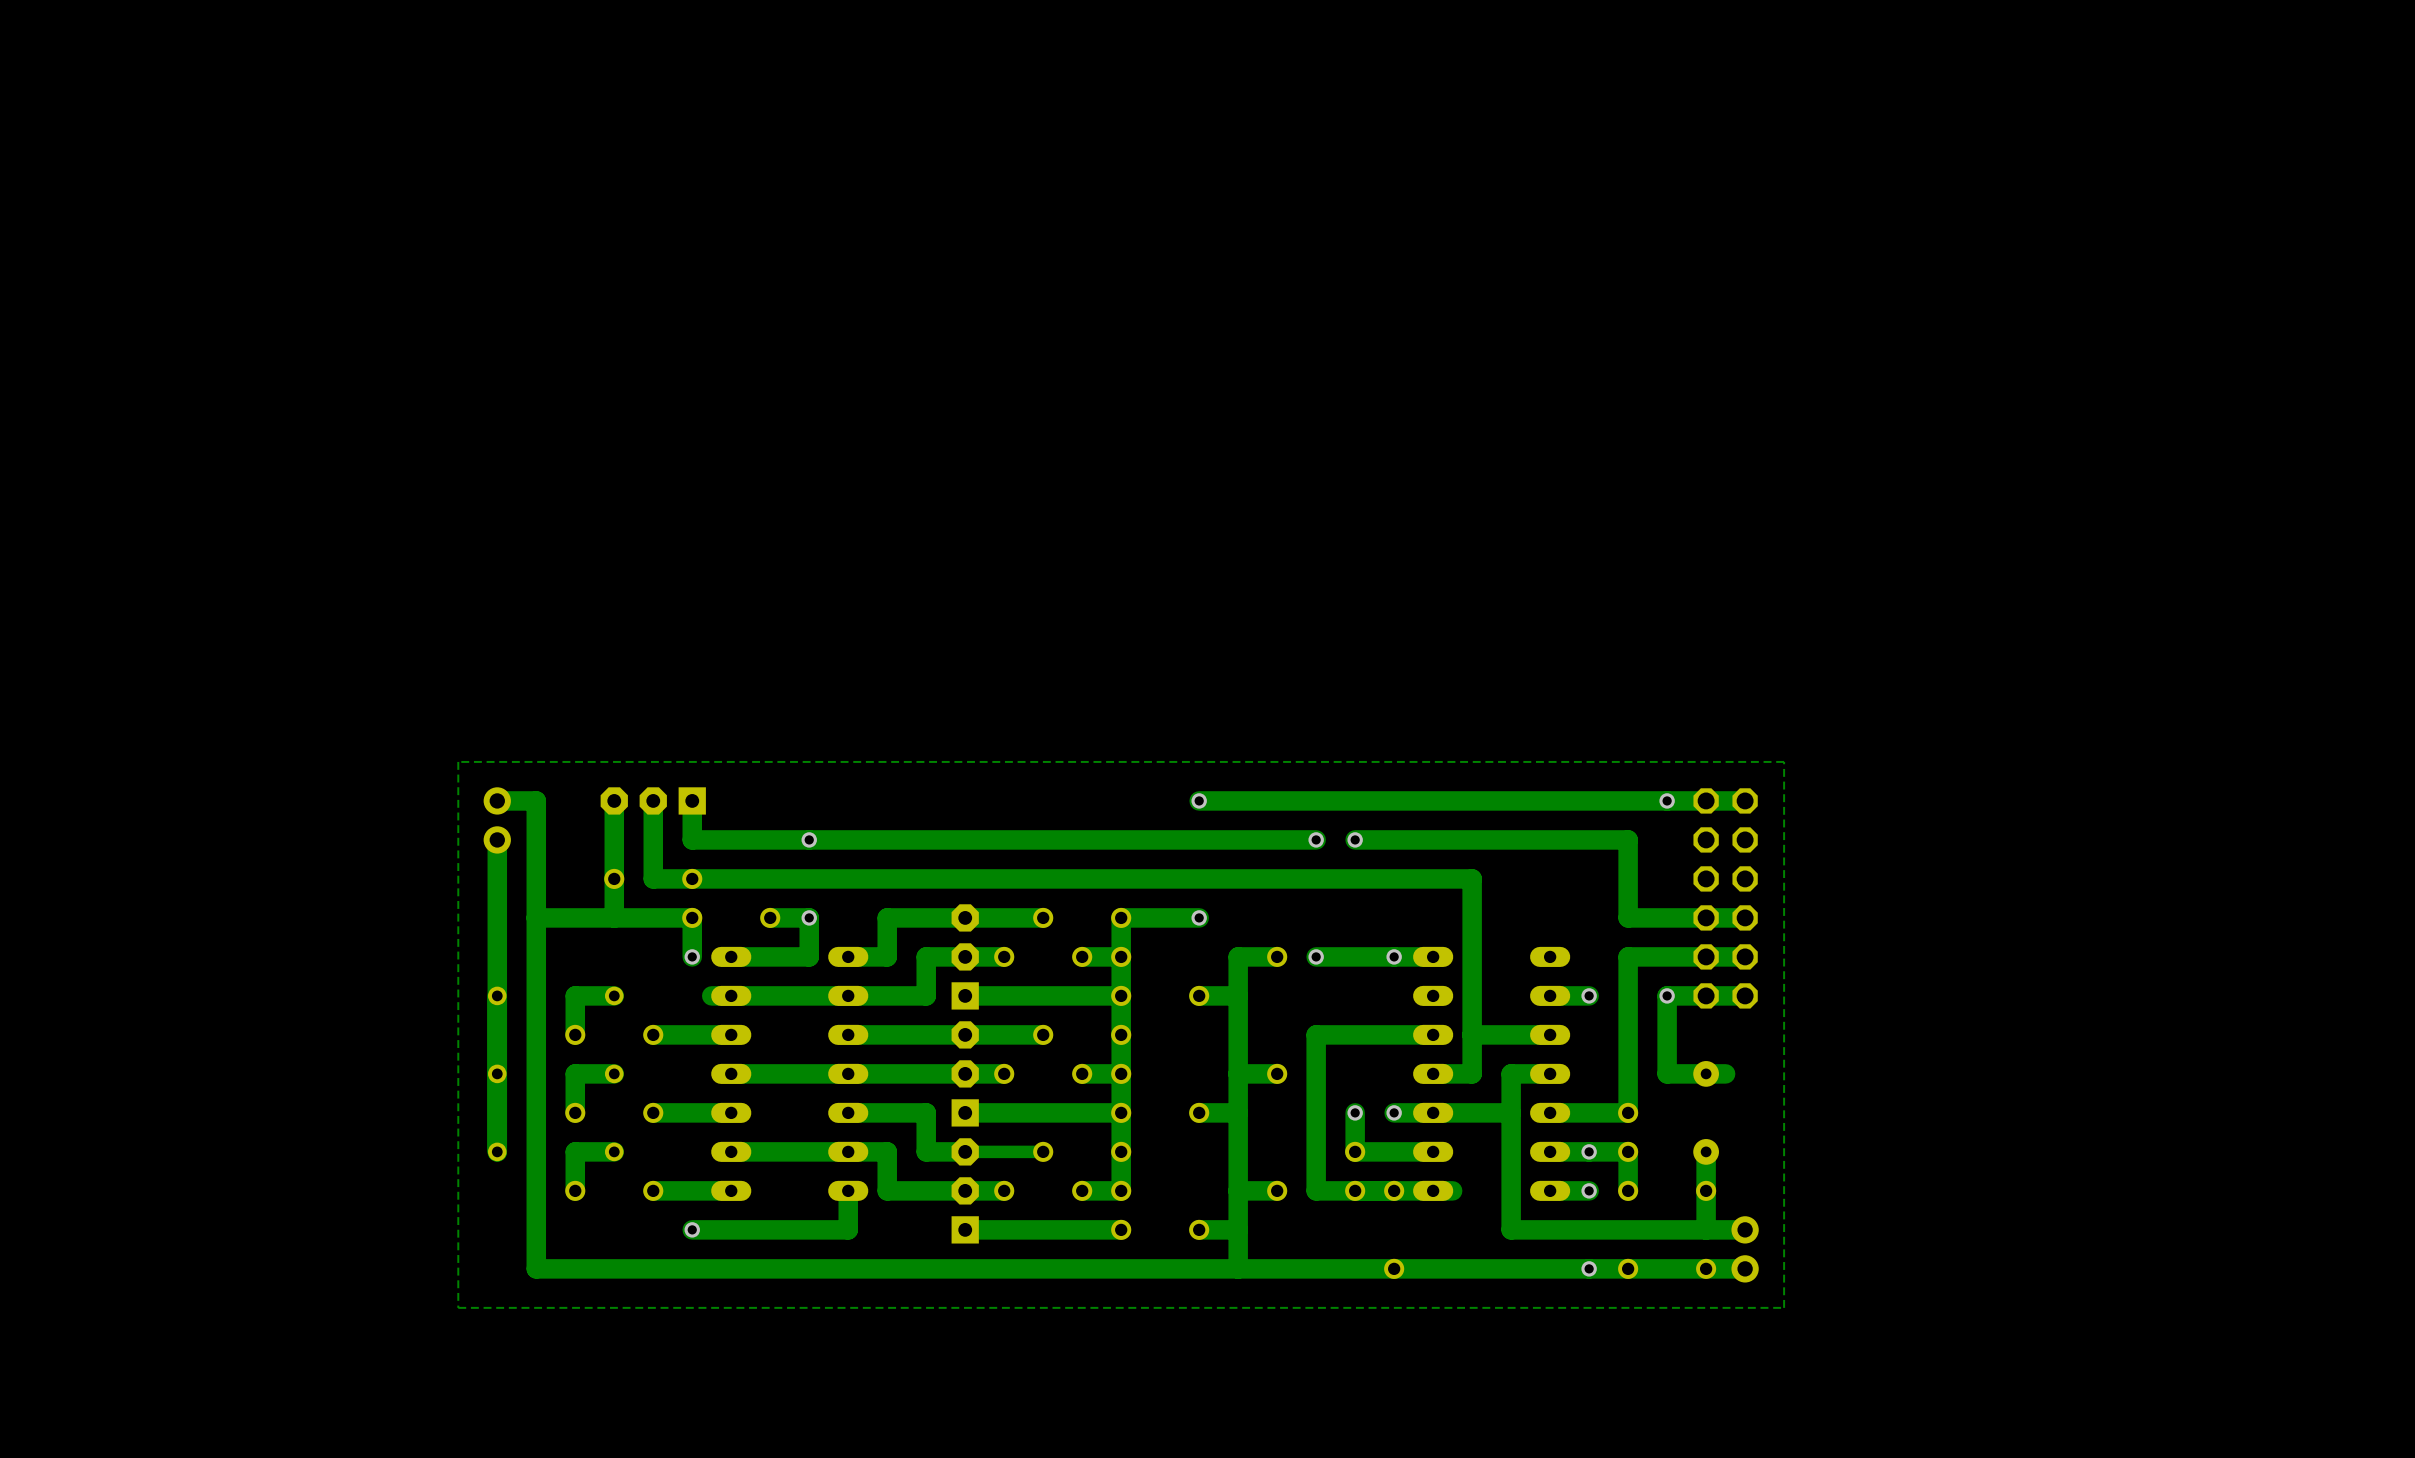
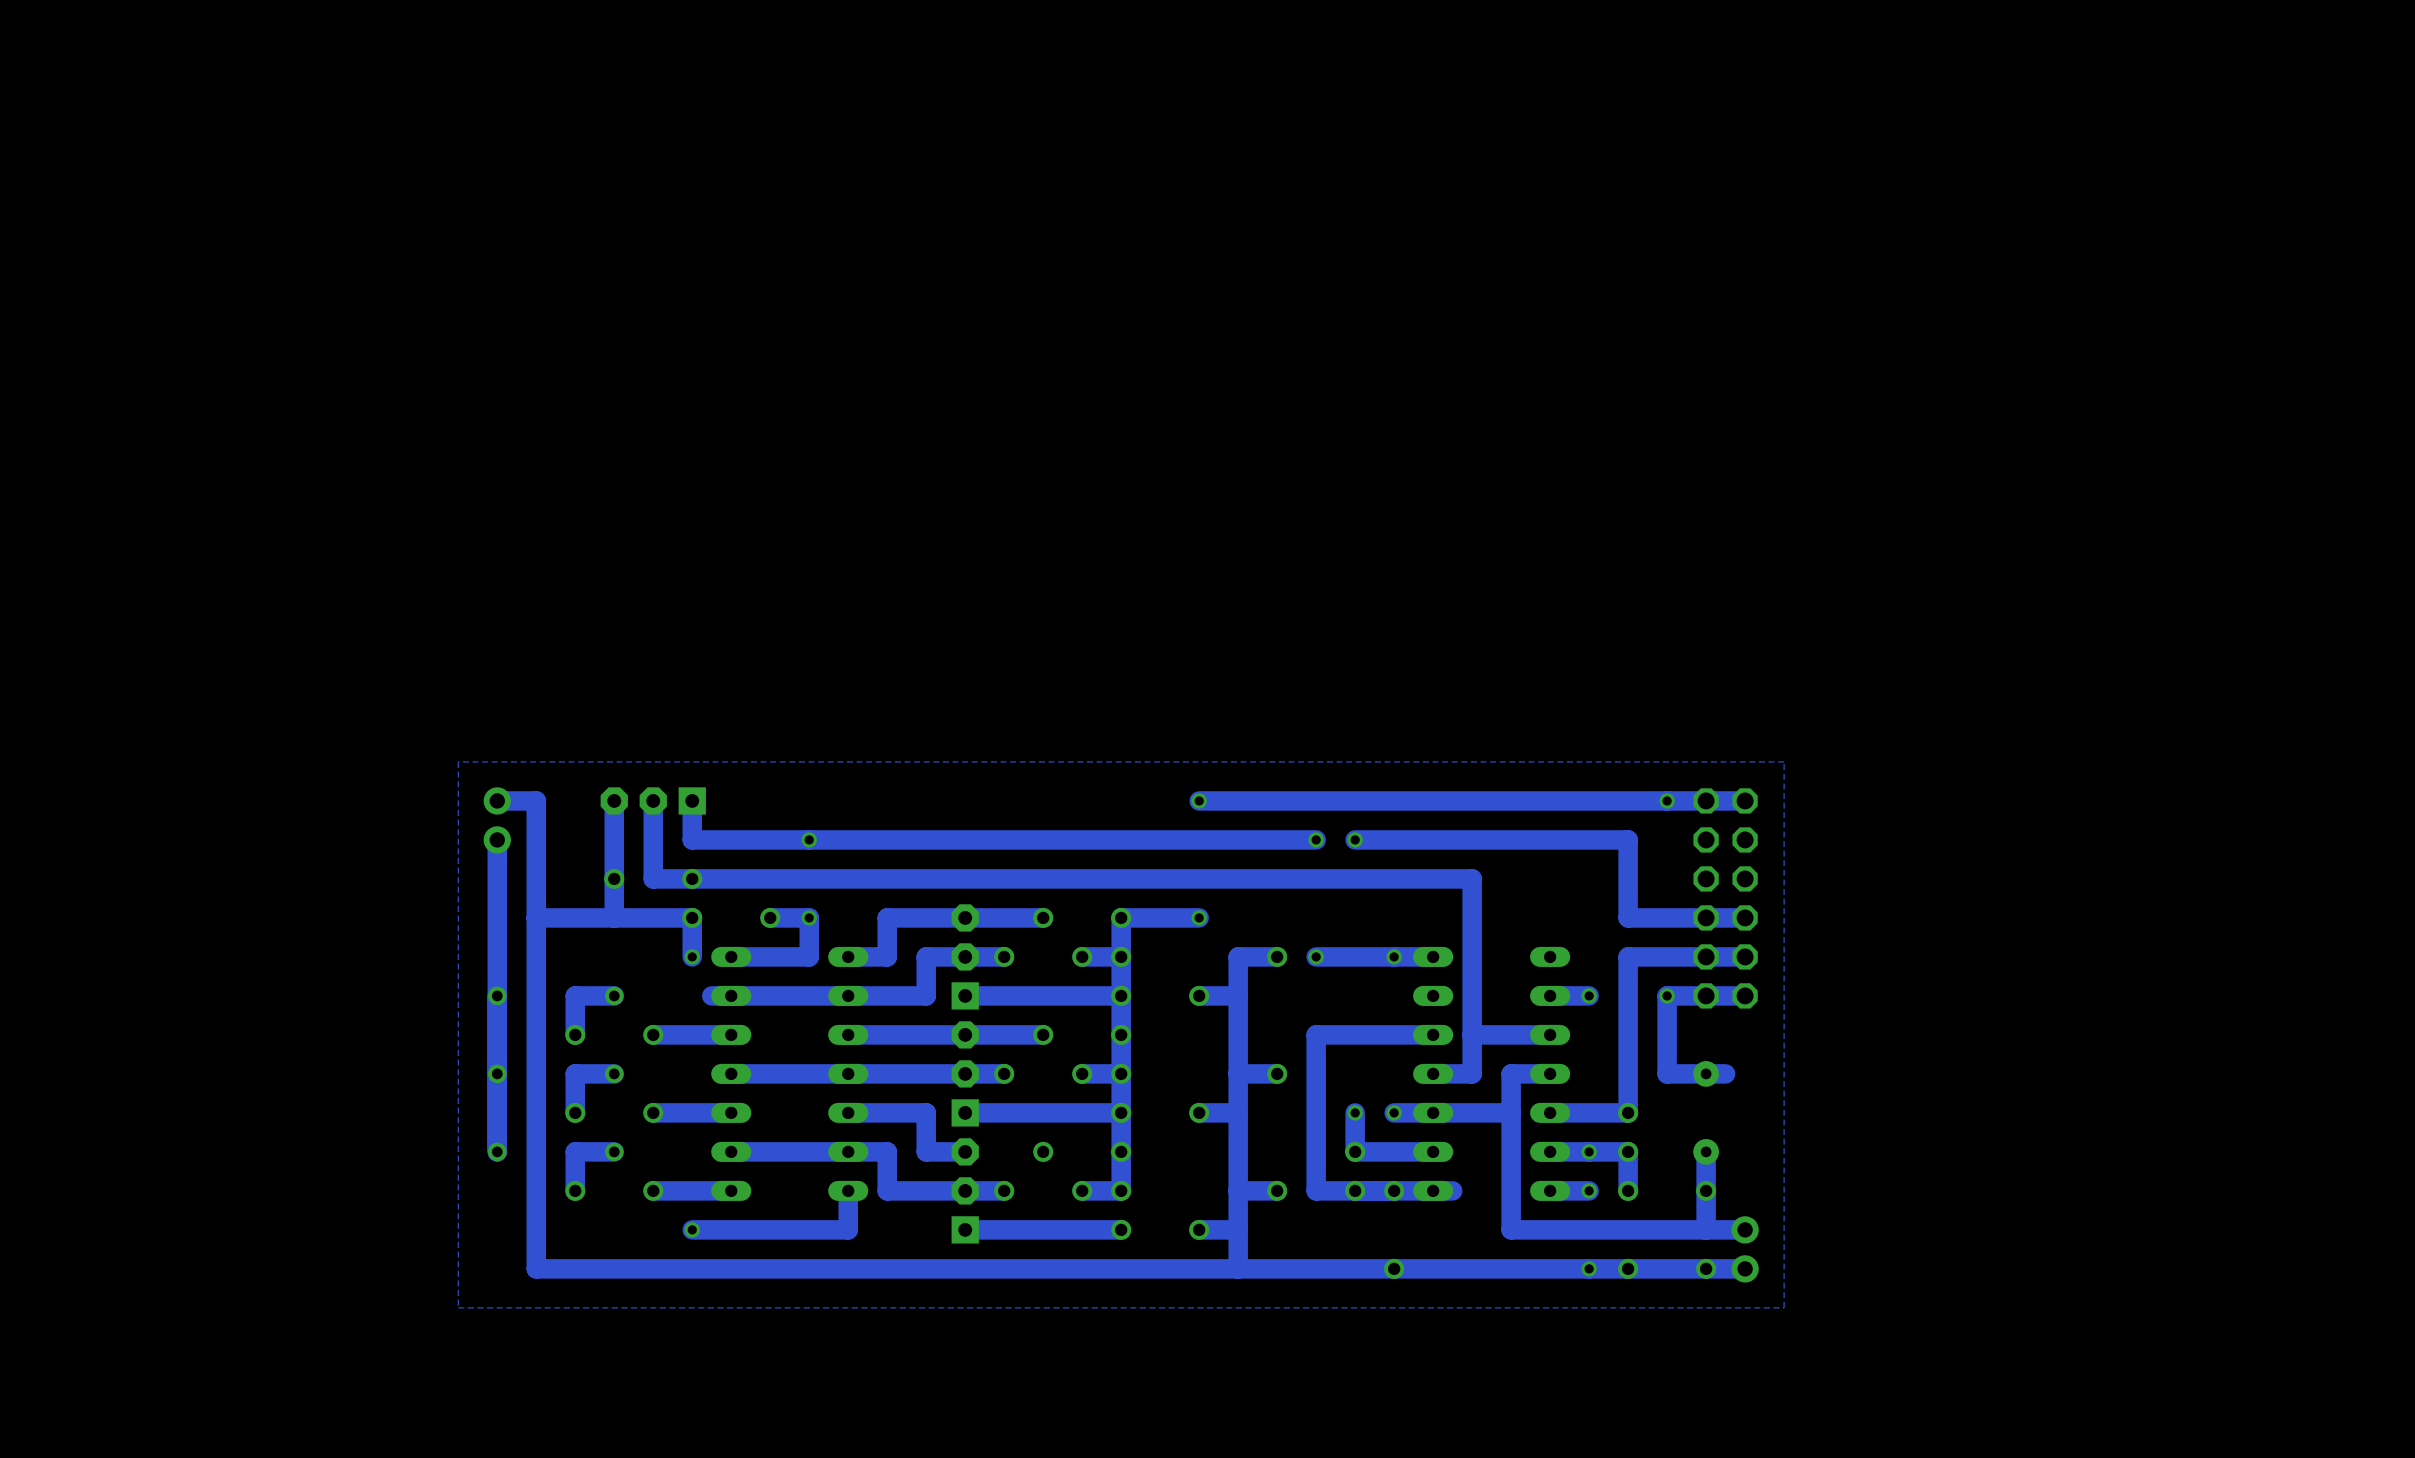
track: (1043, 1151) (965, 1151) -> none

